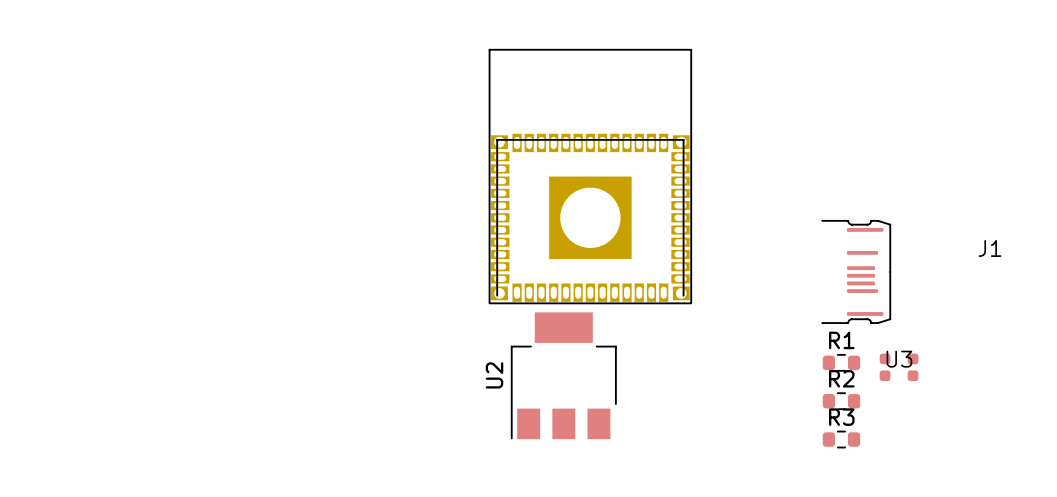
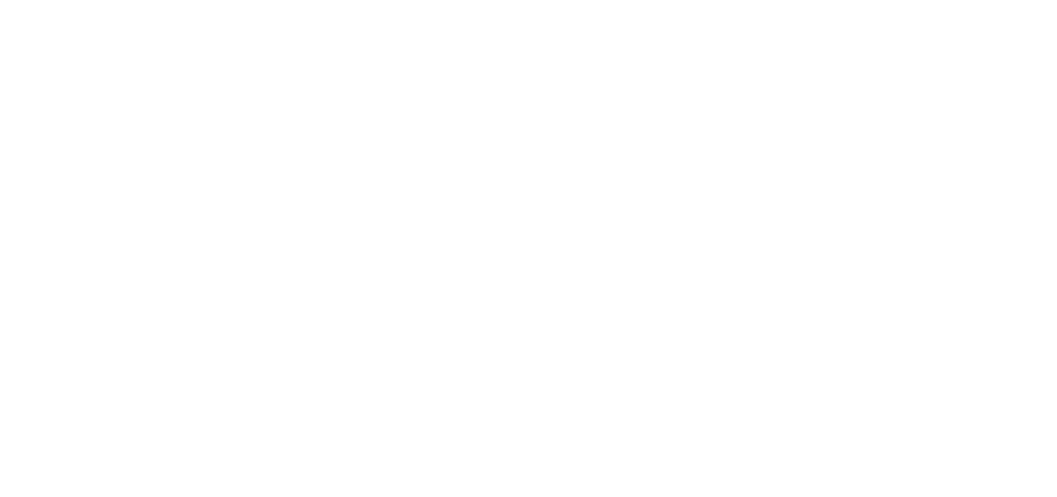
part: (590, 176) -> none
J1: (856, 271) -> none
R1: (841, 362) -> none
U3: (899, 367) -> none
U2: (563, 375) -> none
R2: (841, 401) -> none
R3: (841, 439) -> none

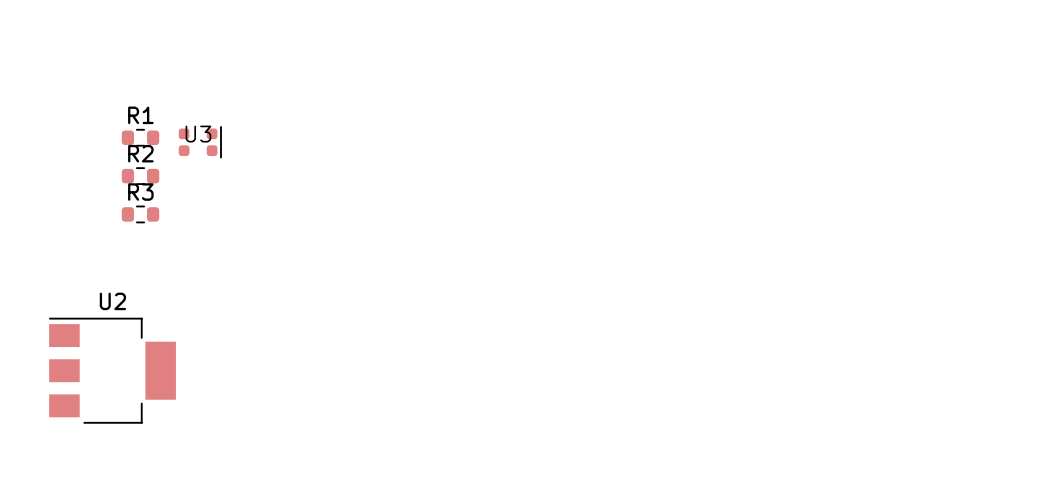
R1: none -> (140, 137)
U3: none -> (200, 142)
R2: none -> (140, 176)
R3: none -> (140, 214)
U2: none -> (112, 370)

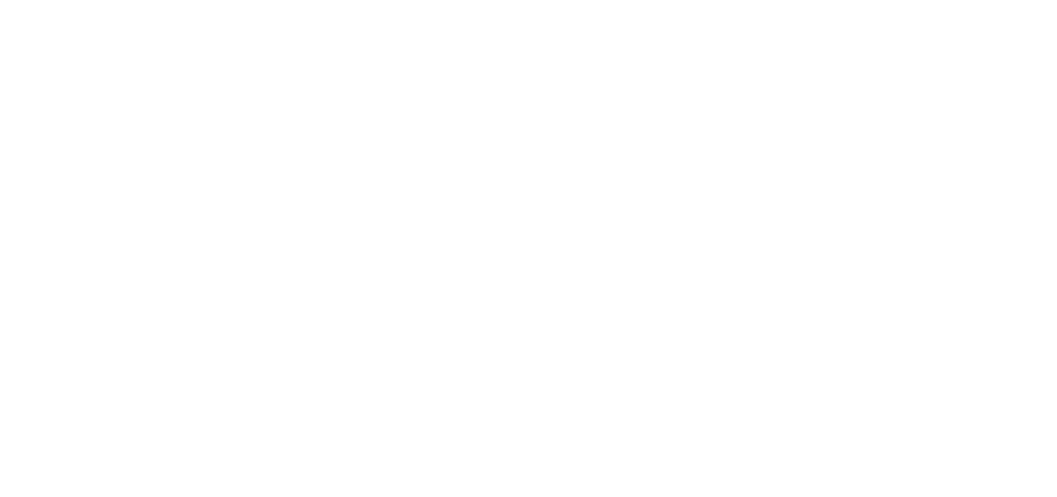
R1: (140, 137) -> none
U3: (200, 142) -> none
R2: (140, 176) -> none
R3: (140, 214) -> none
U2: (112, 370) -> none

